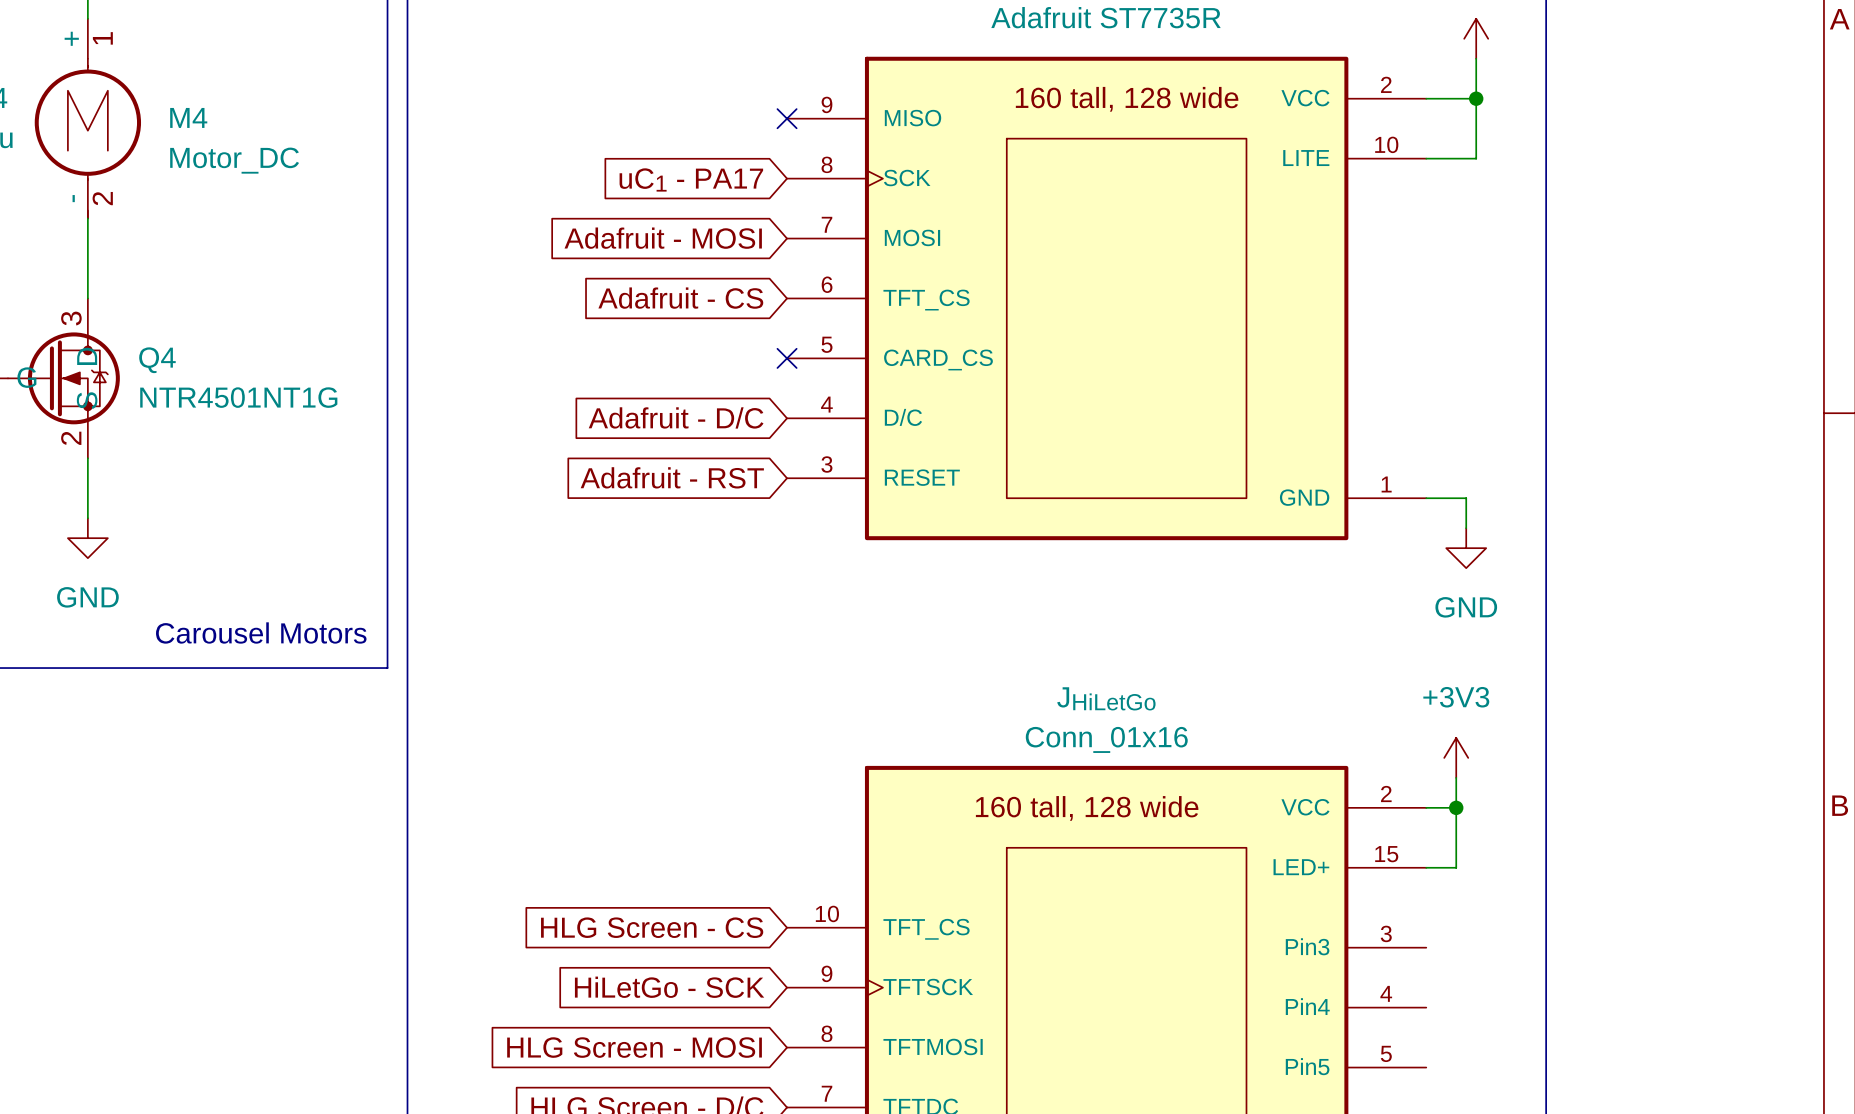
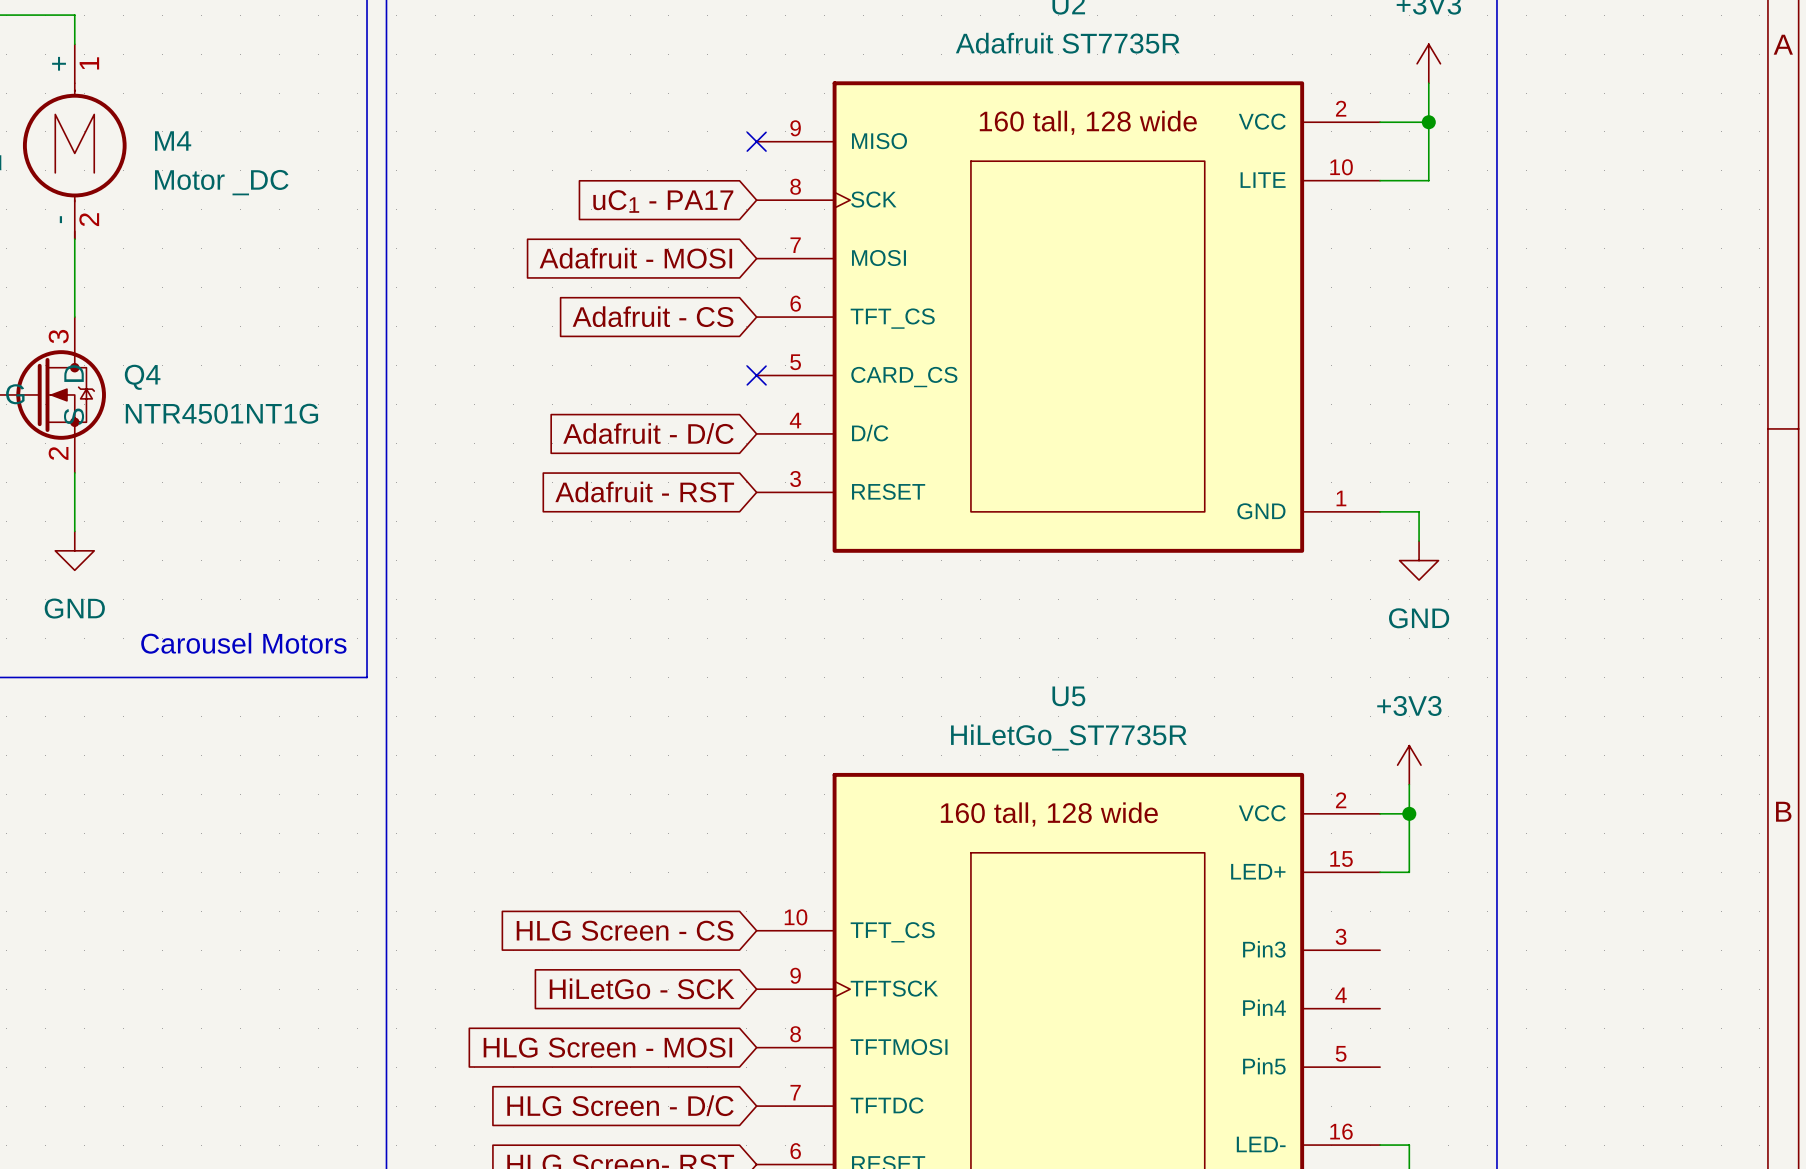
M4 value: Motor_DC (234, 160) -> Motor _DC (221, 182)
JHiLetGo name: JHiLetGo (1106, 698) -> U5 (1068, 696)
JHiLetGo value: Conn_01x16 (1106, 739) -> HiLetGo_ST7735R (1068, 737)

